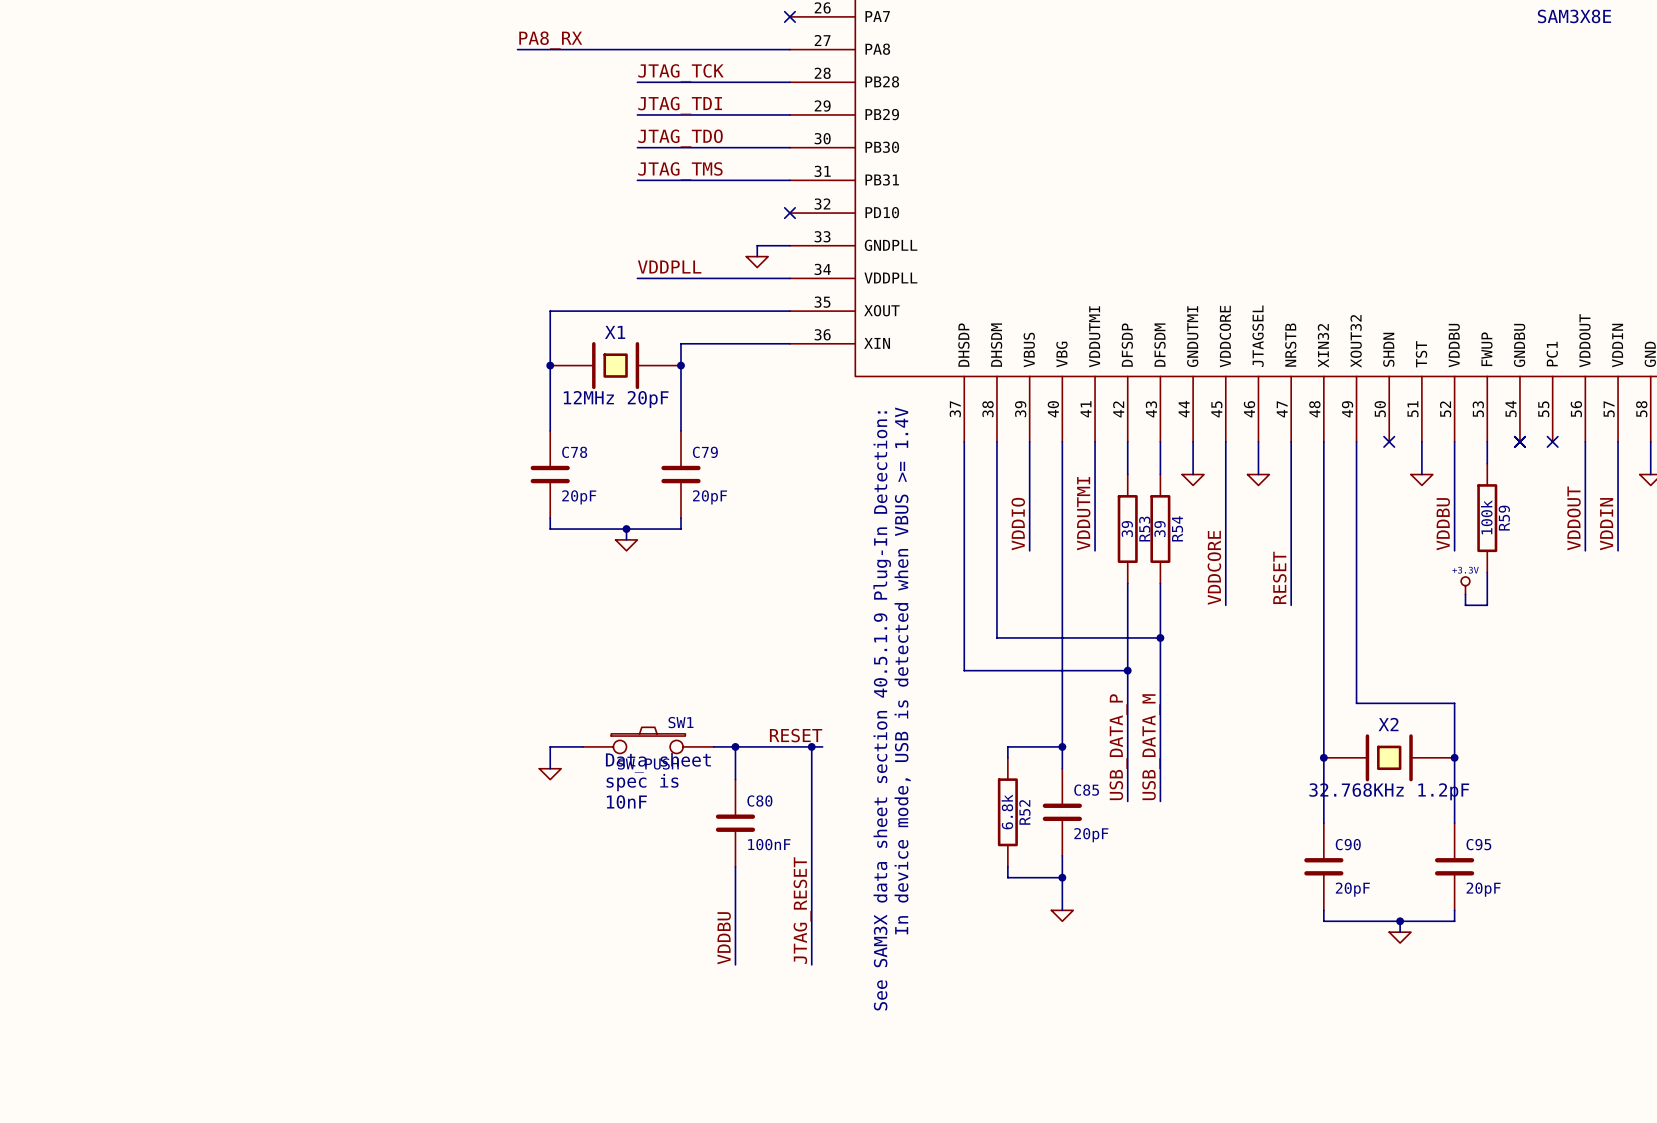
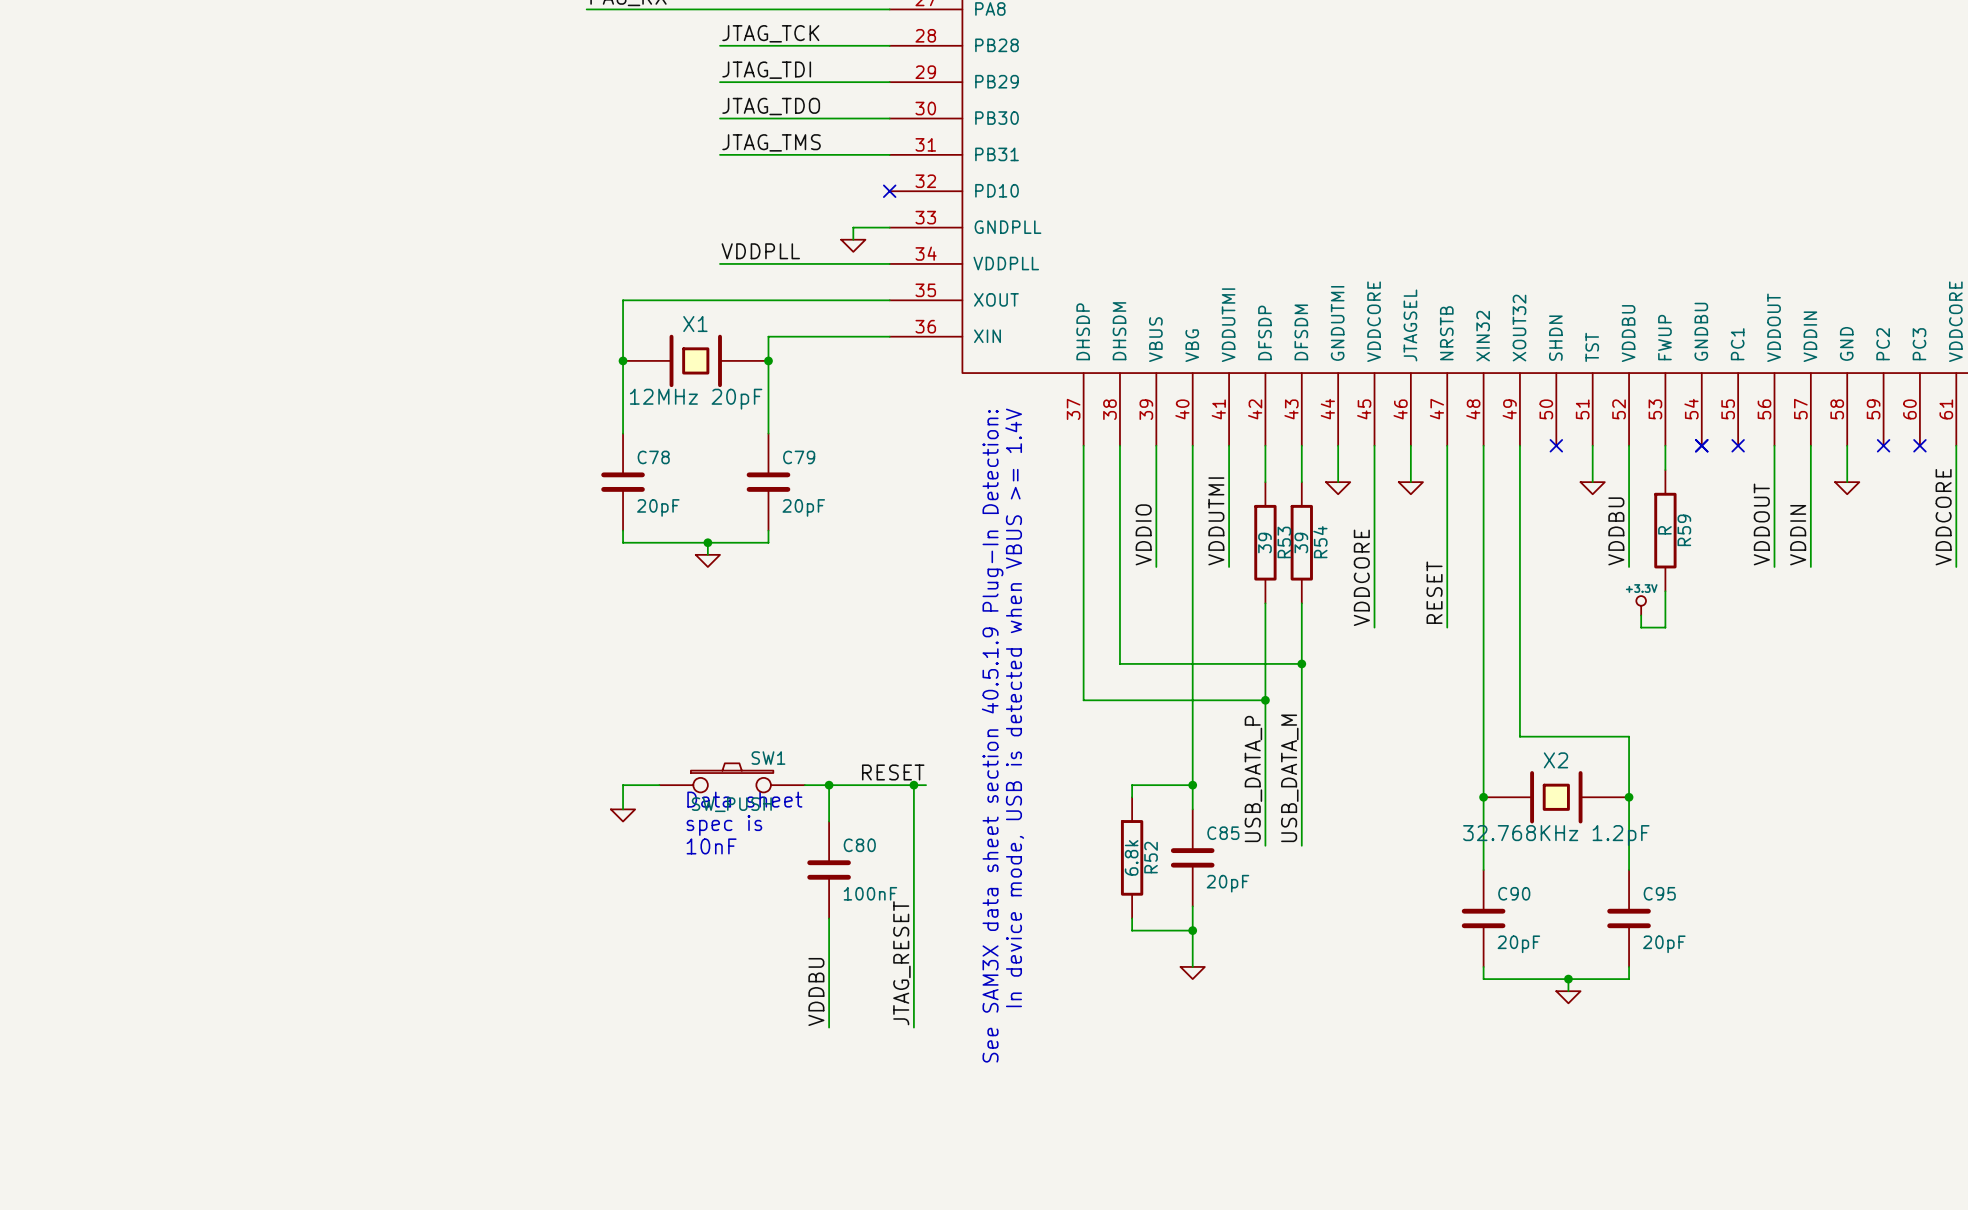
R59 value: 100k (1486, 517) -> R (1664, 530)

